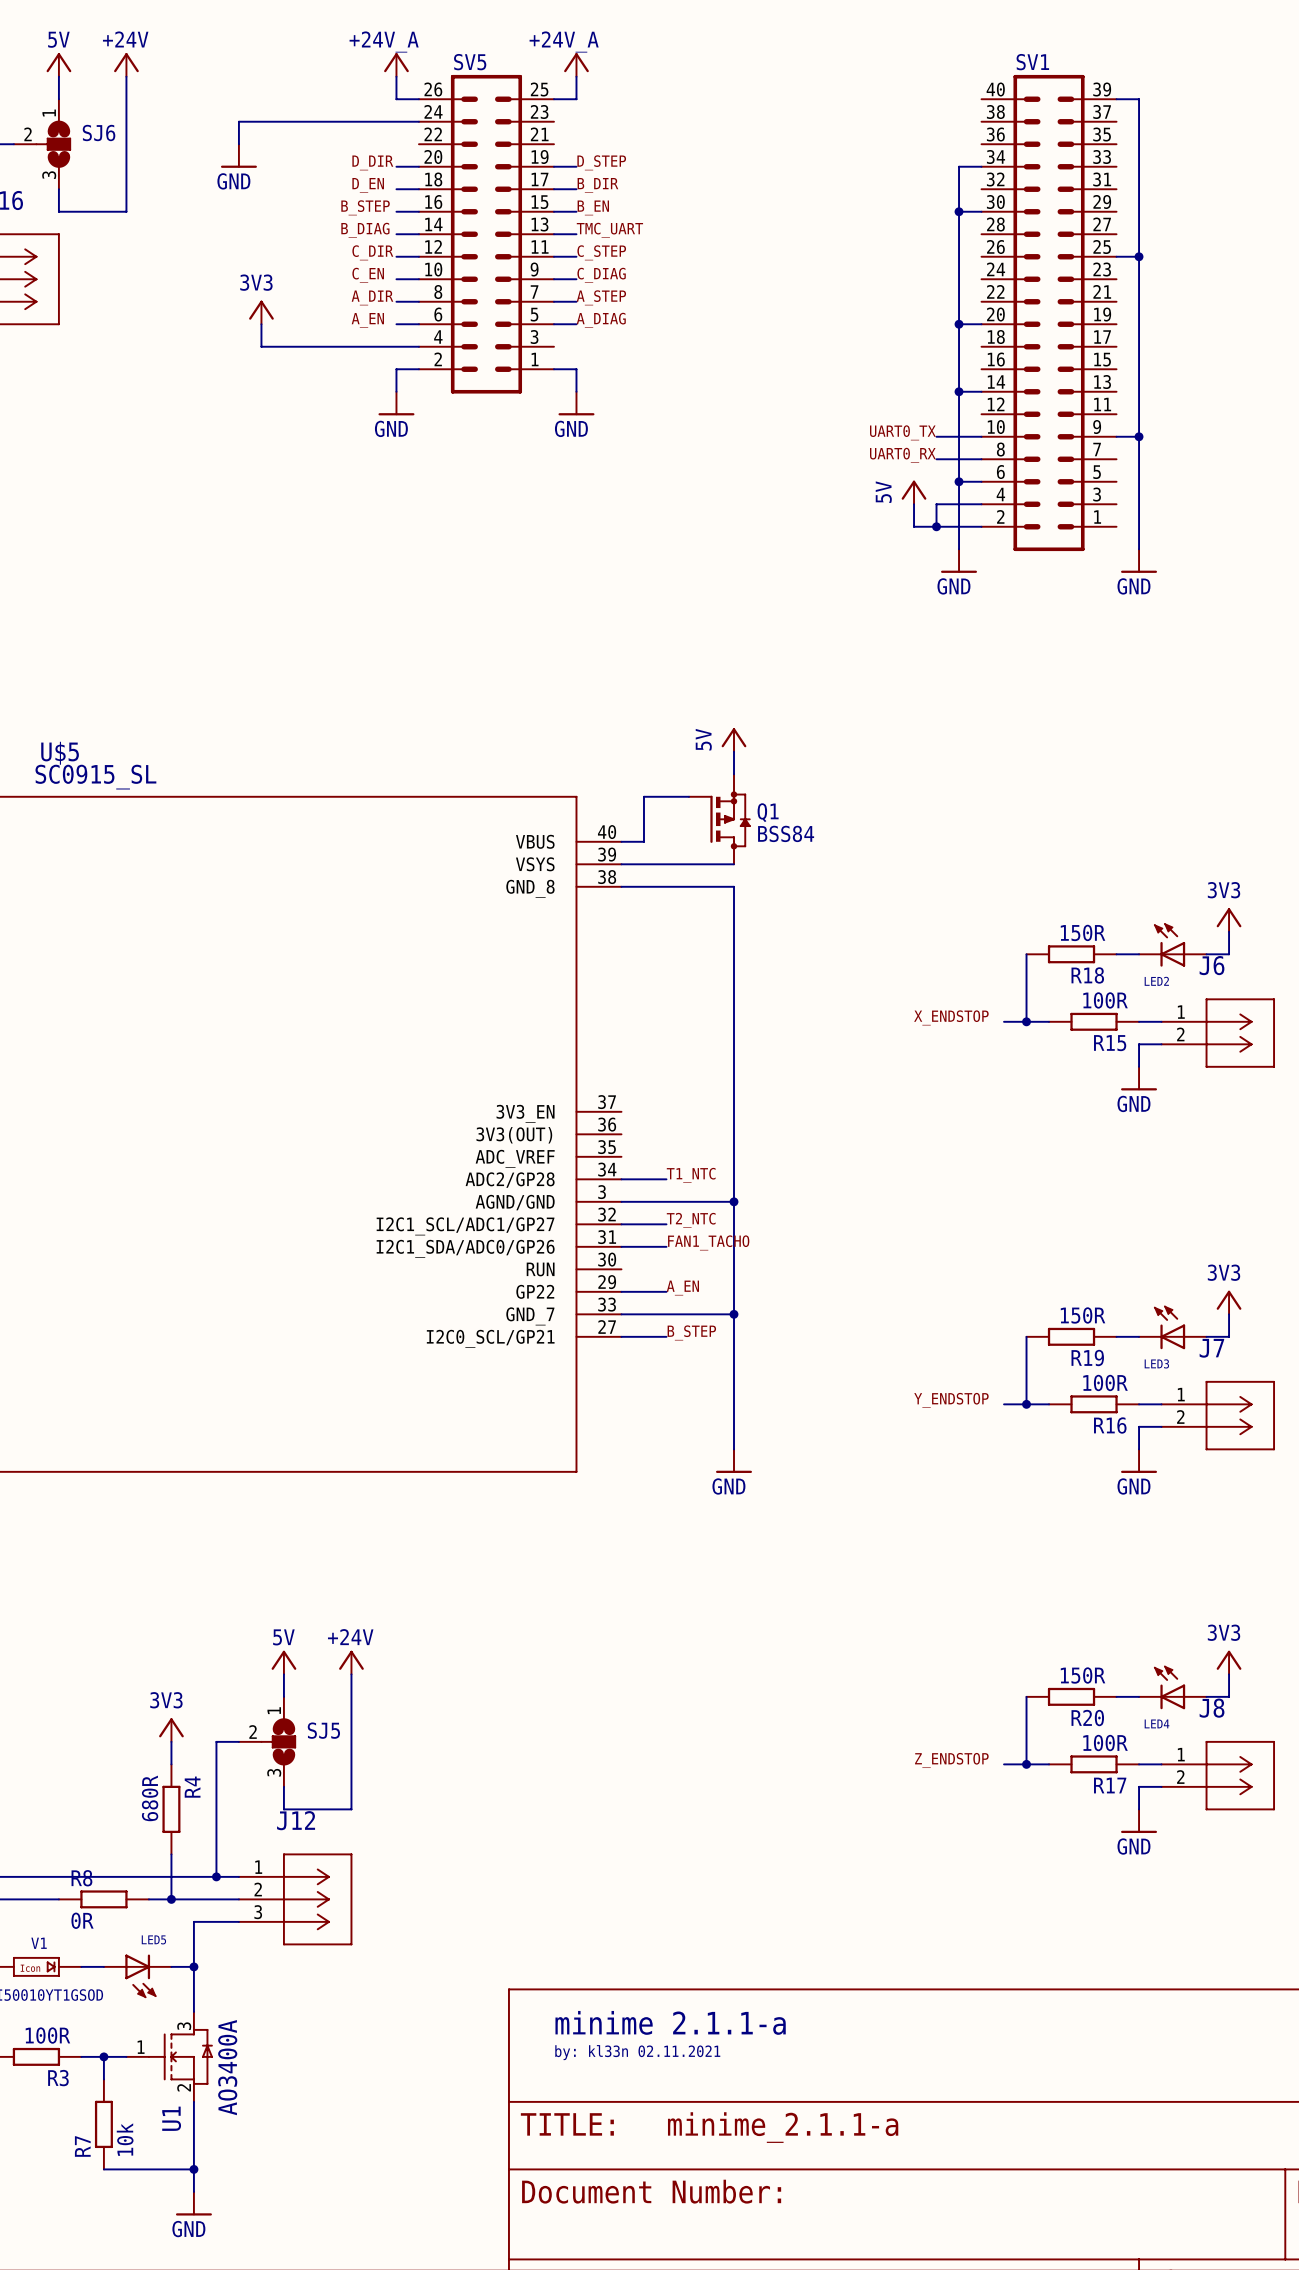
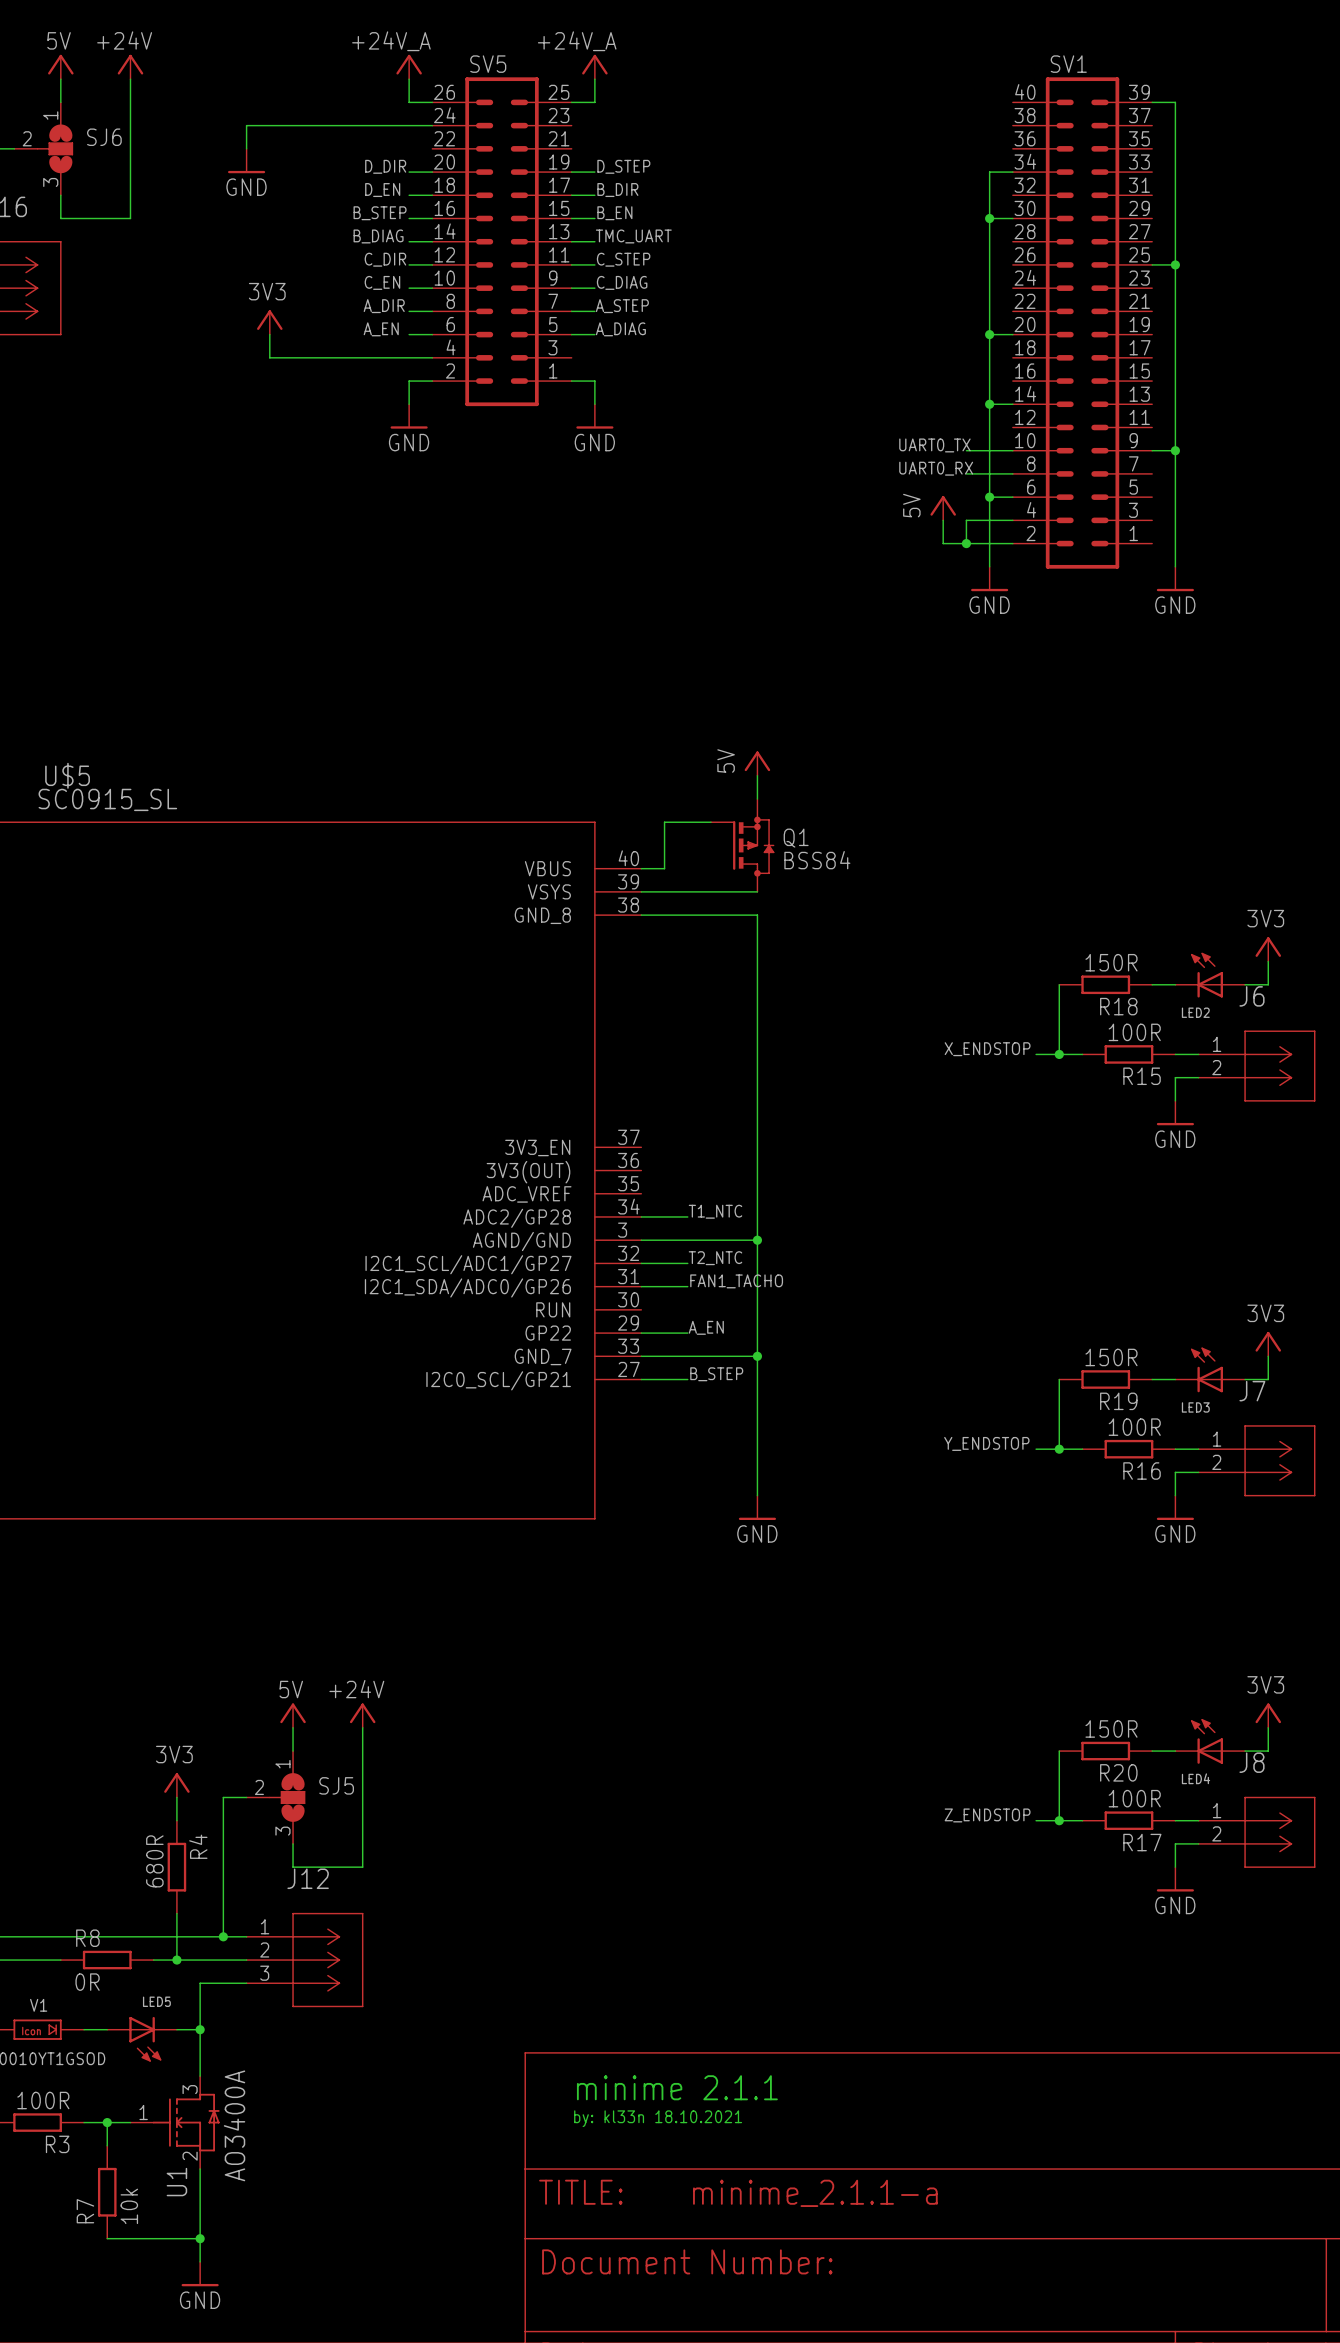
text: minime 2.1.1-a (670, 2022) -> minime 2.1.1 (677, 2087)
text: by: kl33n 02.11.2021 (637, 2052) -> by: kl33n 18.10.2021 (658, 2118)

